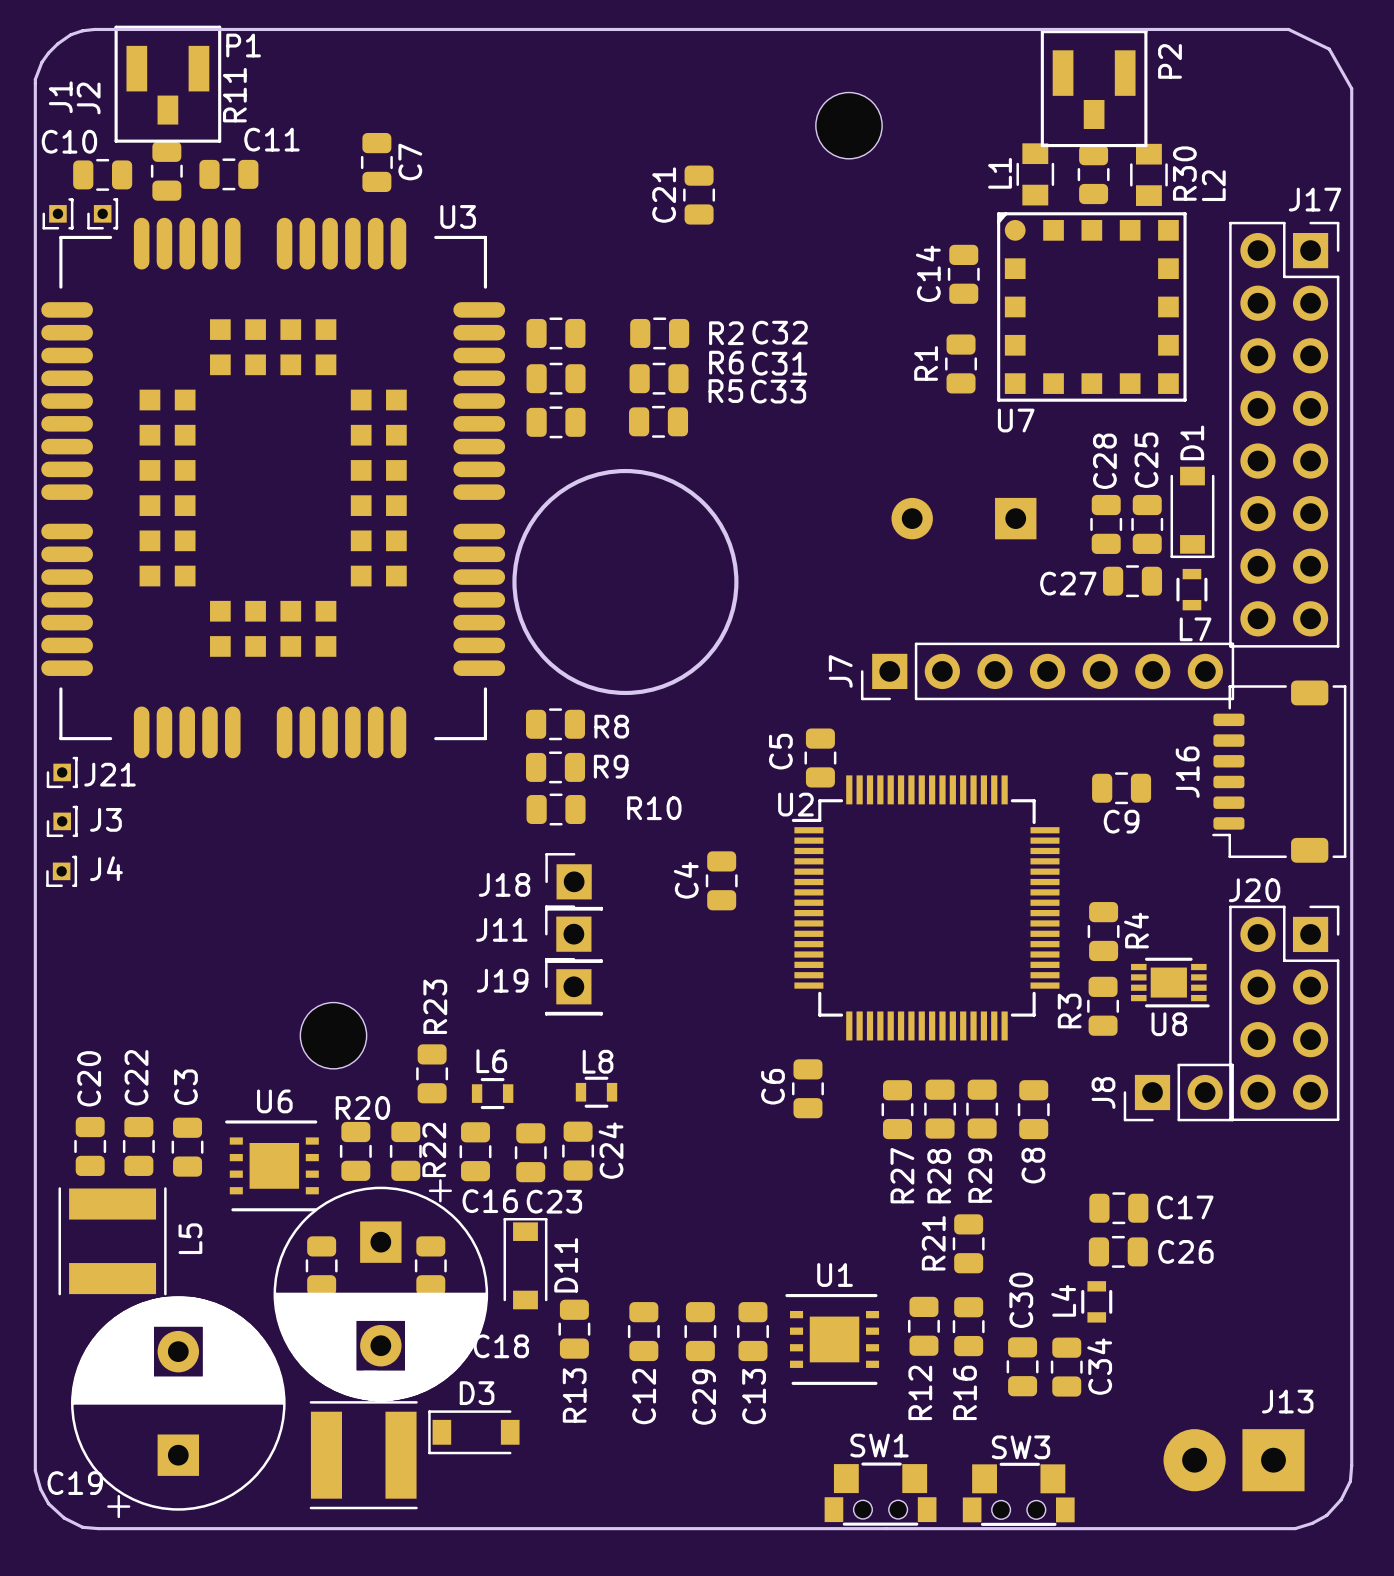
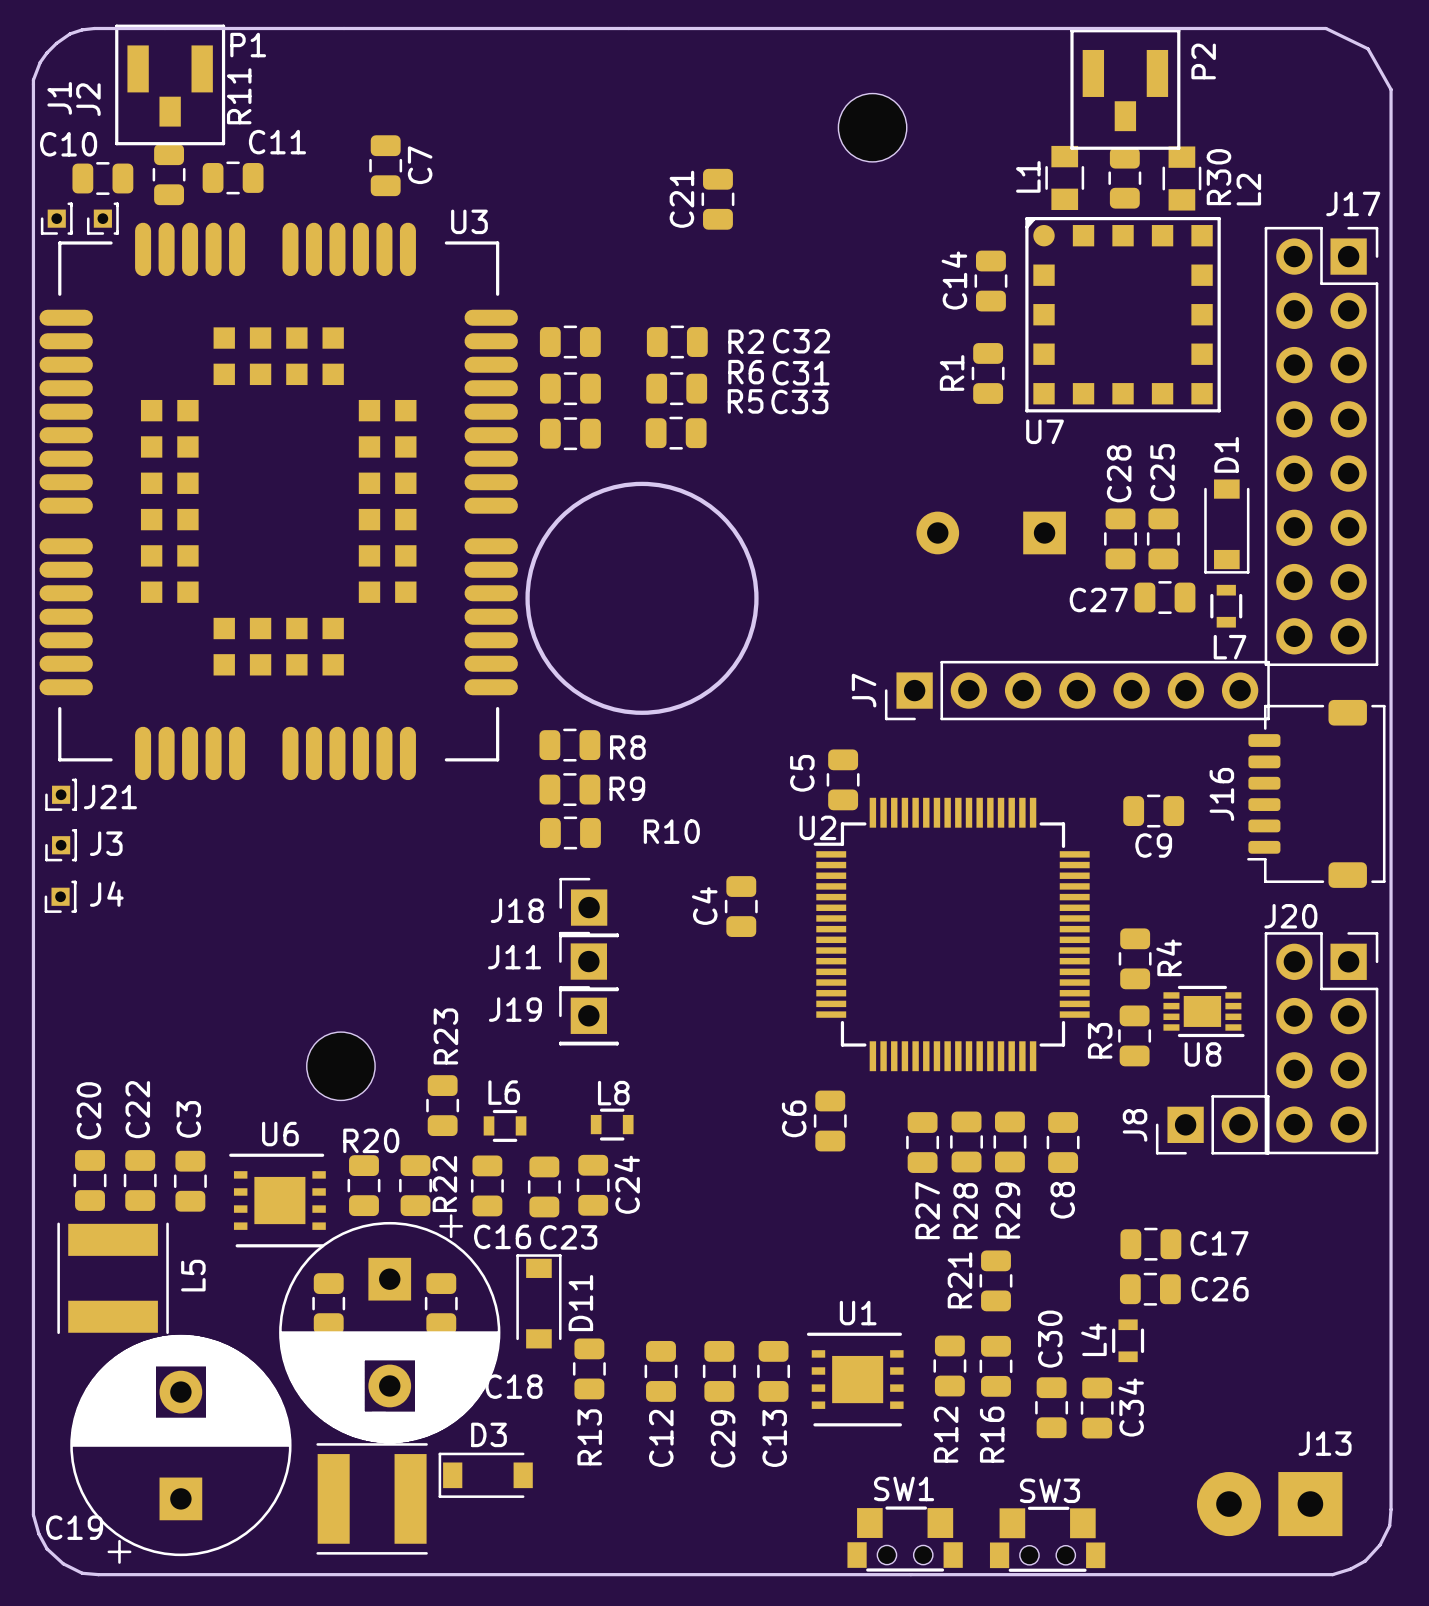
C28 position: (1106, 524) -> (1120, 538)
C25 position: (1147, 524) -> (1163, 538)

